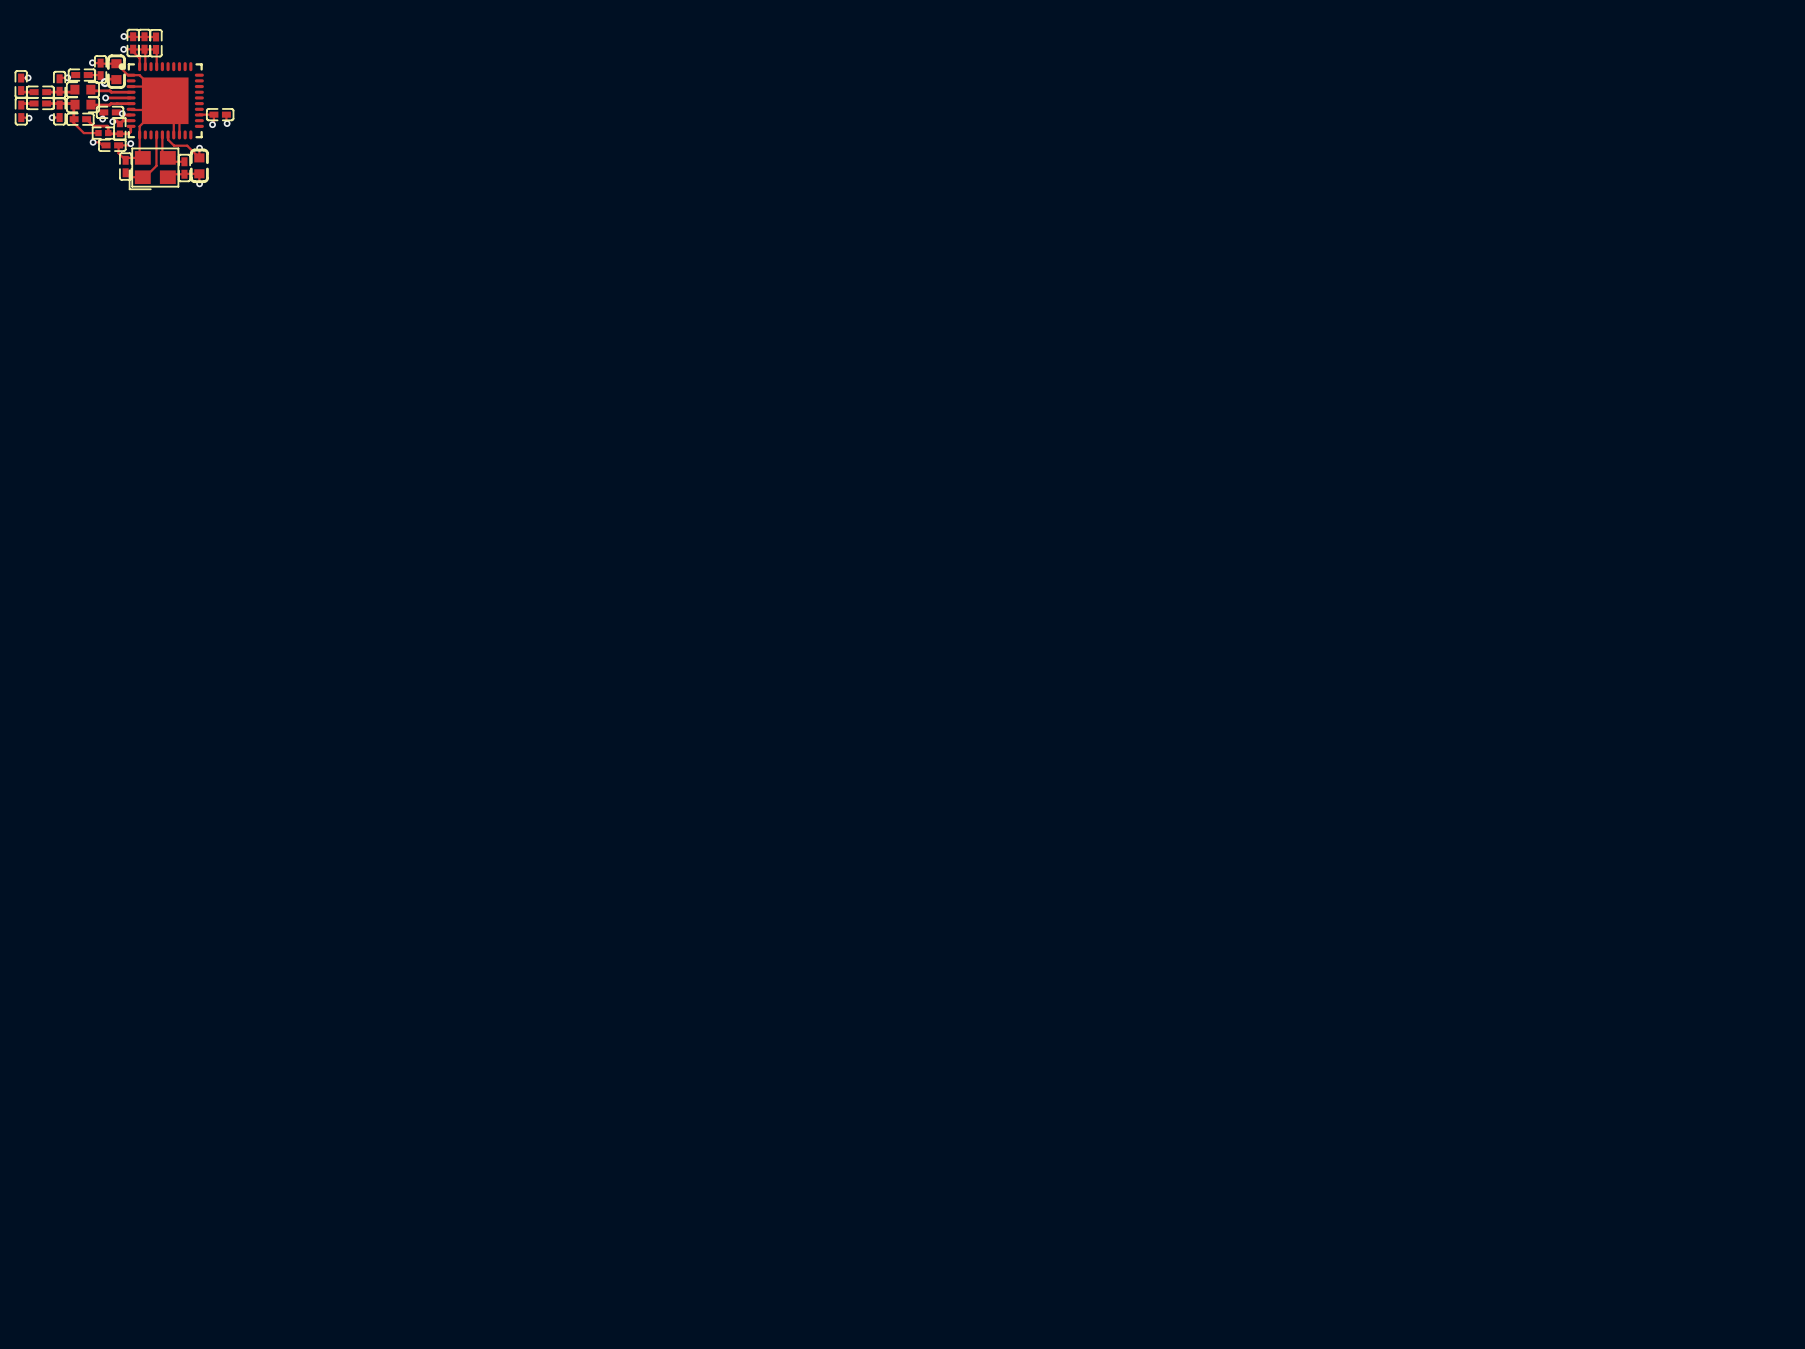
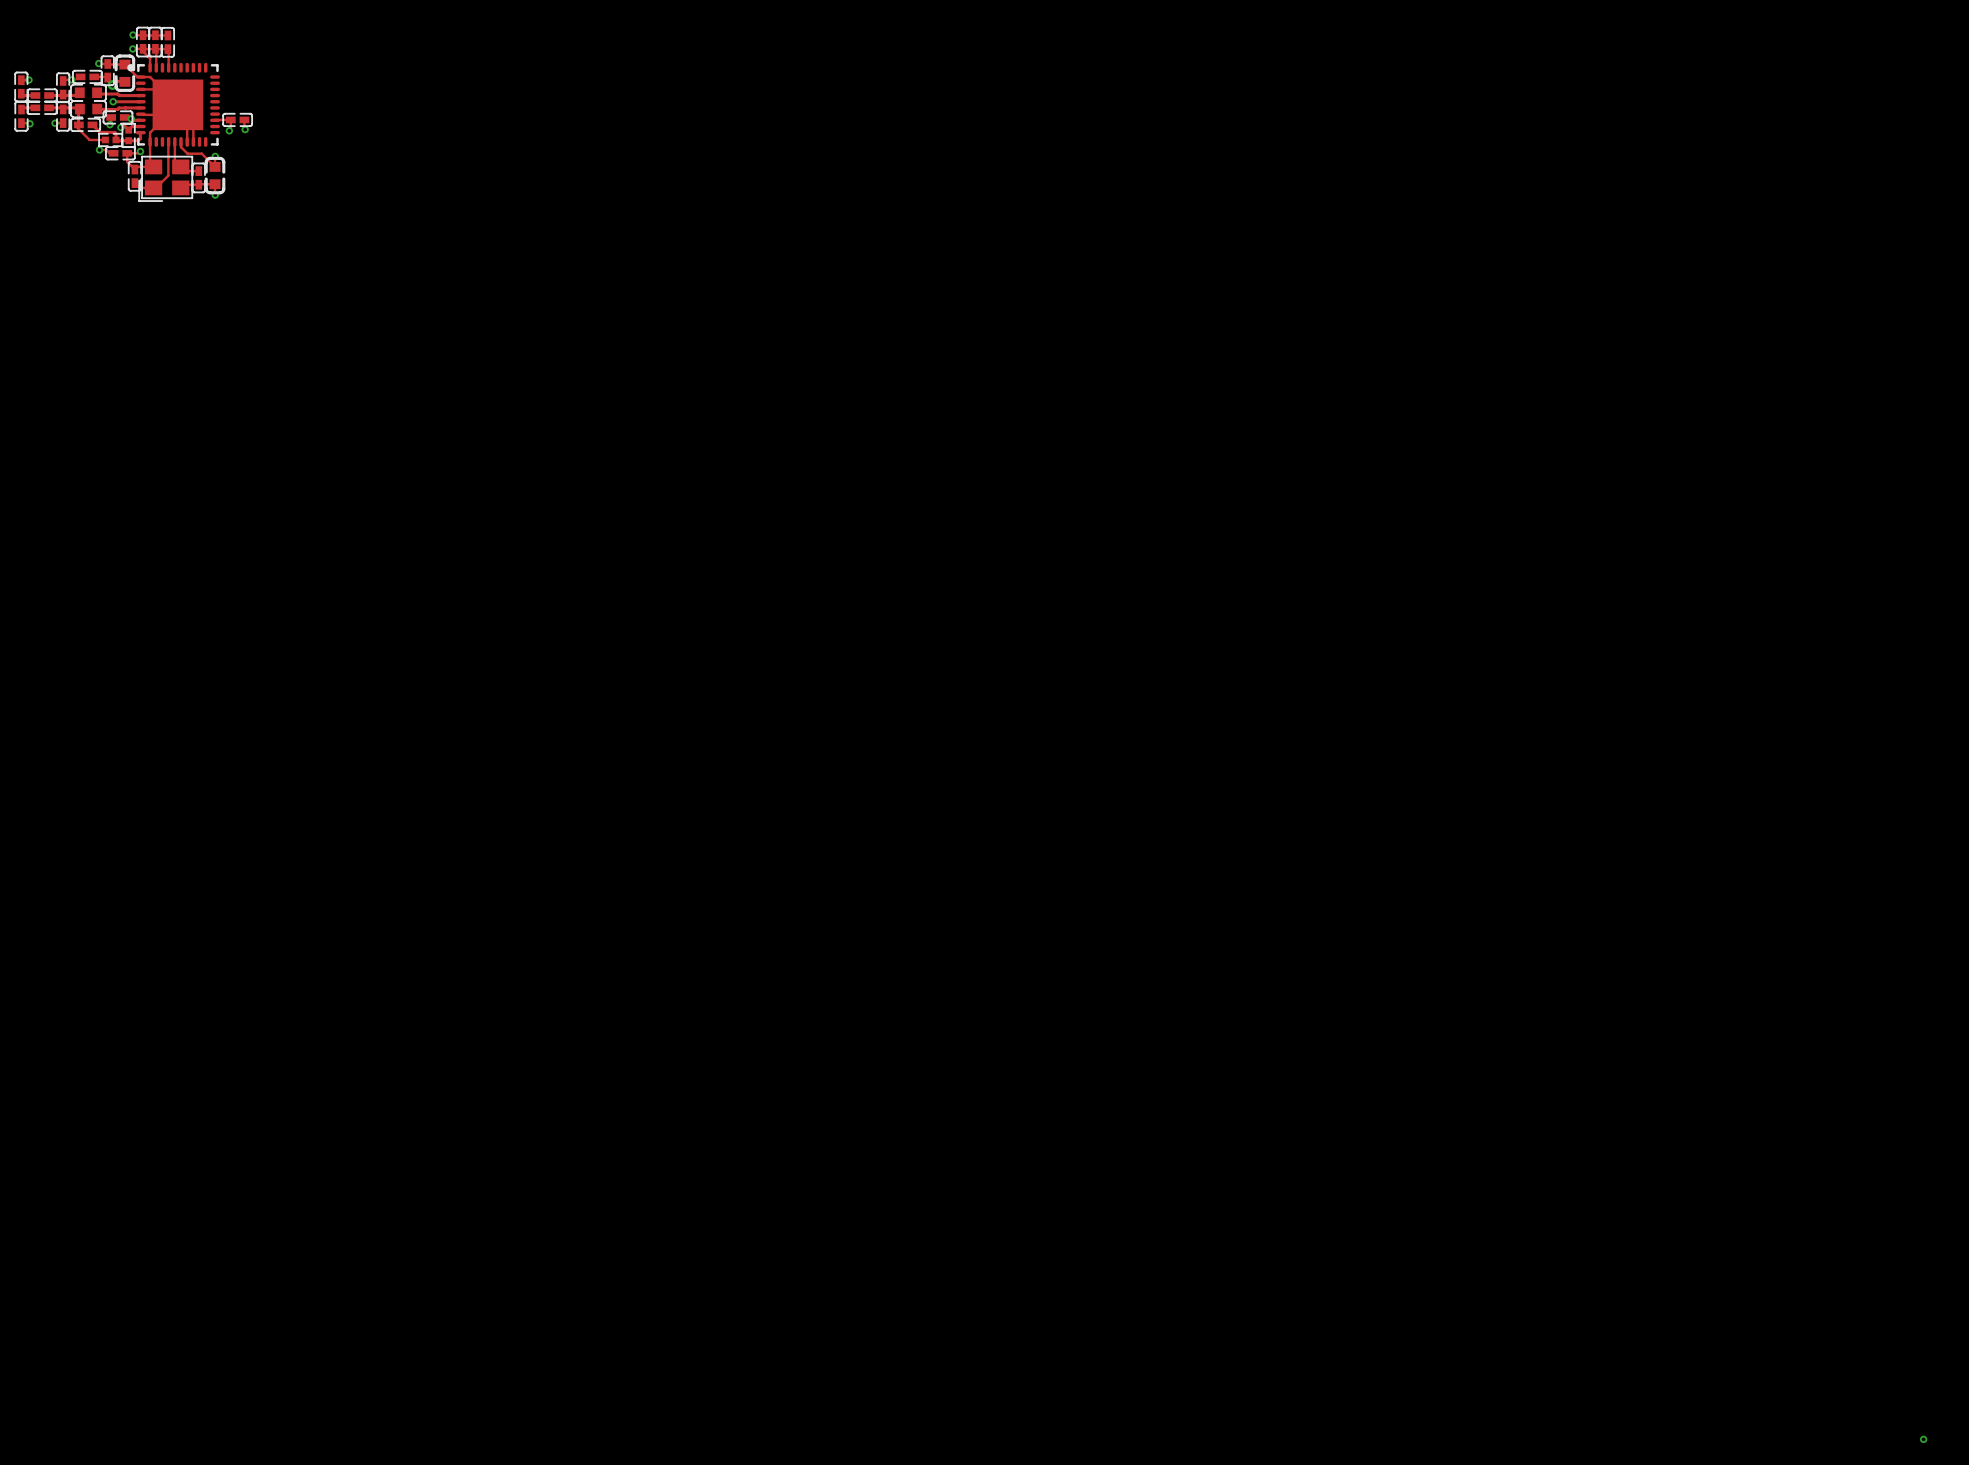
via: none -> (1923, 1439)

